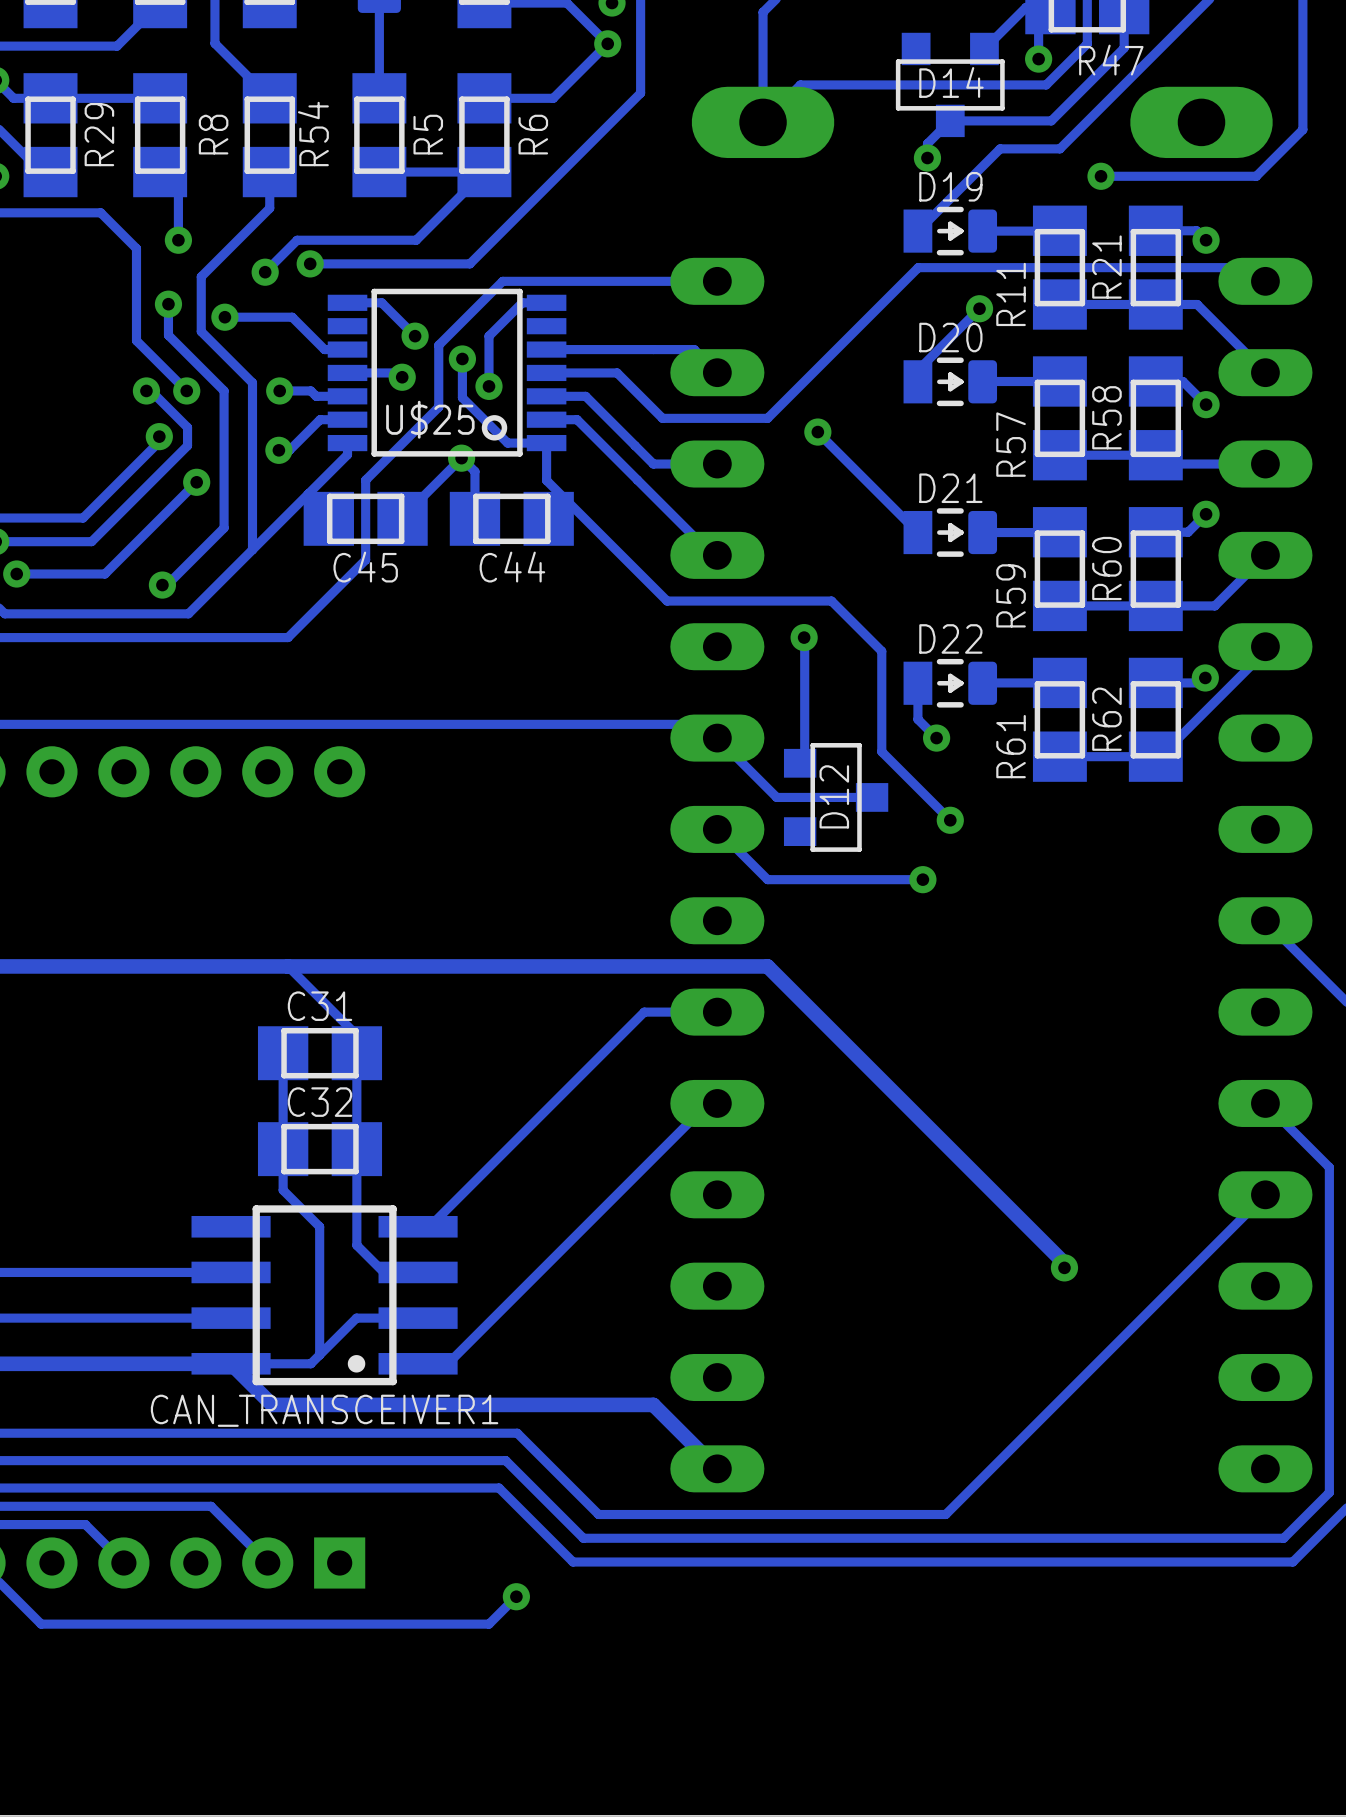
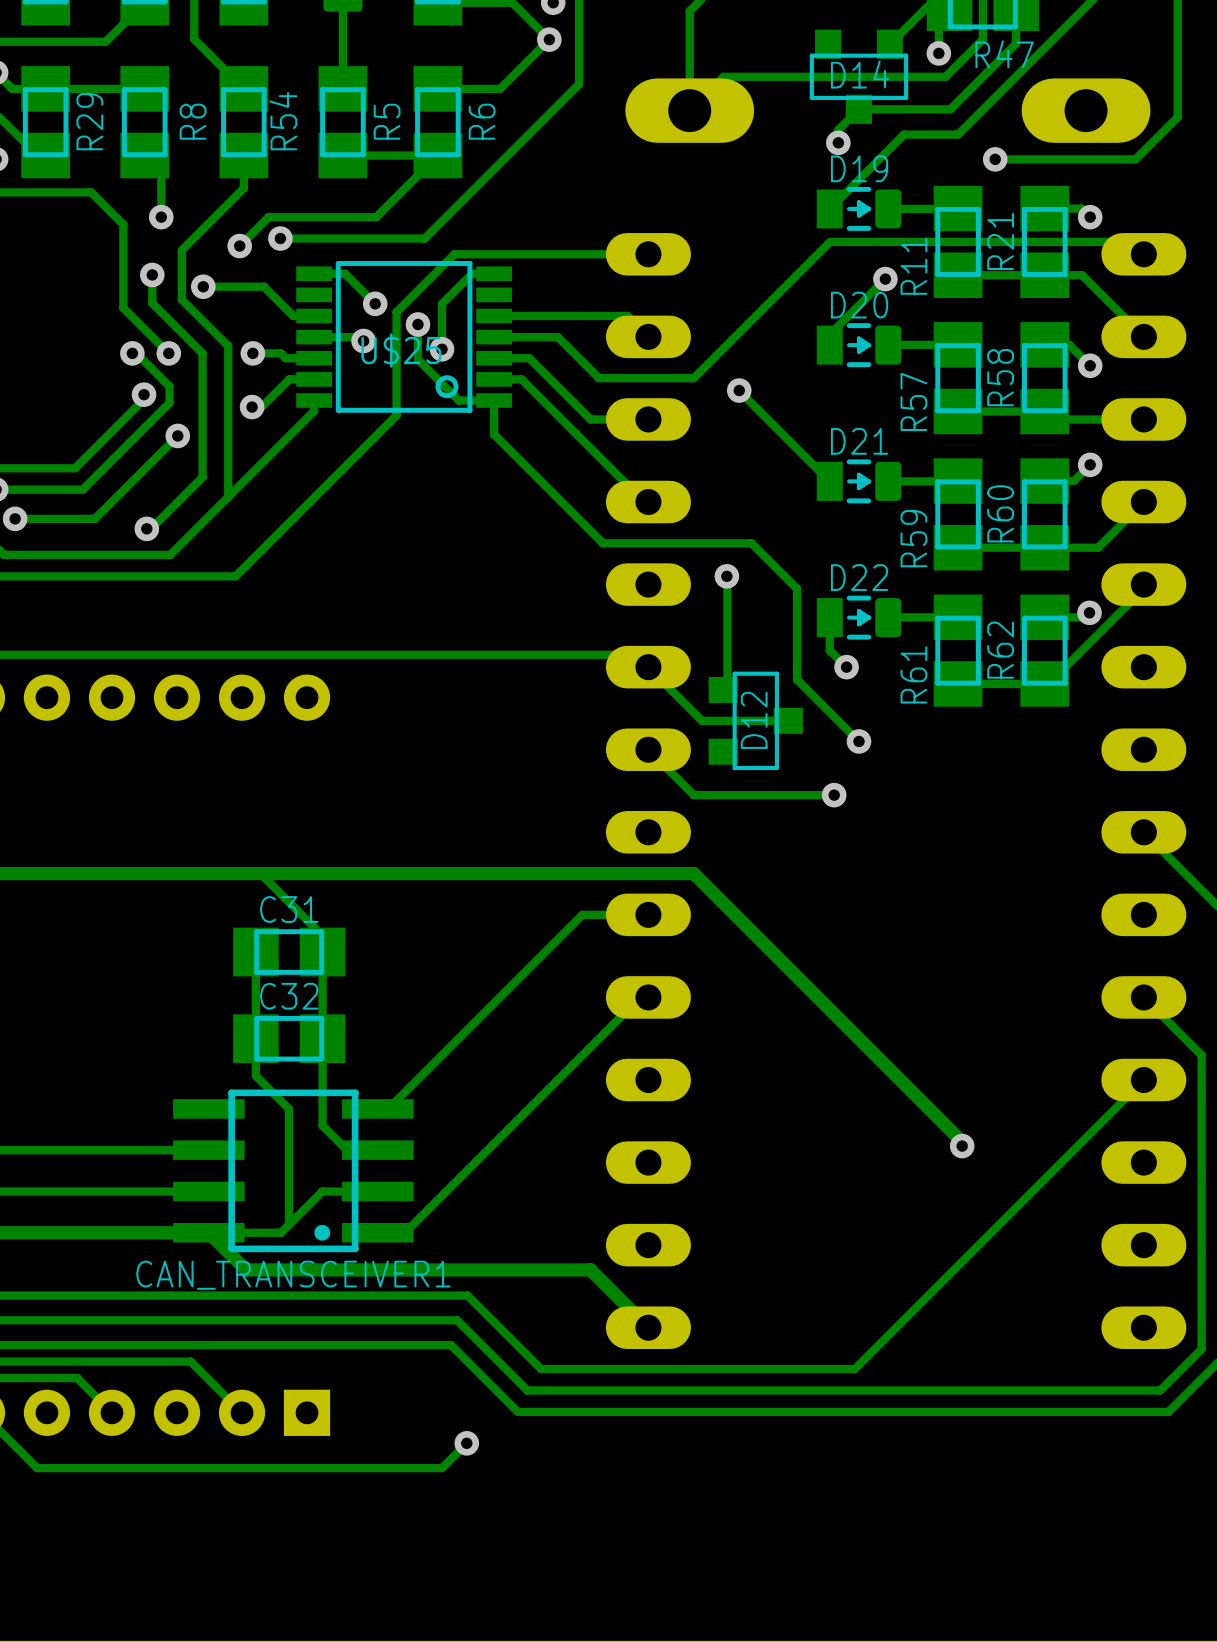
track: (438, 407) (365, 480) (365, 559) (288, 637) (260, 637) -> (396, 368) (396, 415) (235, 576)
U$25 name position: U$25 (430, 419) -> U$25 (401, 350)
via: (461, 458) -> none
C45: (365, 518) -> none
track: (474, 518) (474, 471) (461, 458) (402, 518) -> none
C44: (511, 518) -> none

